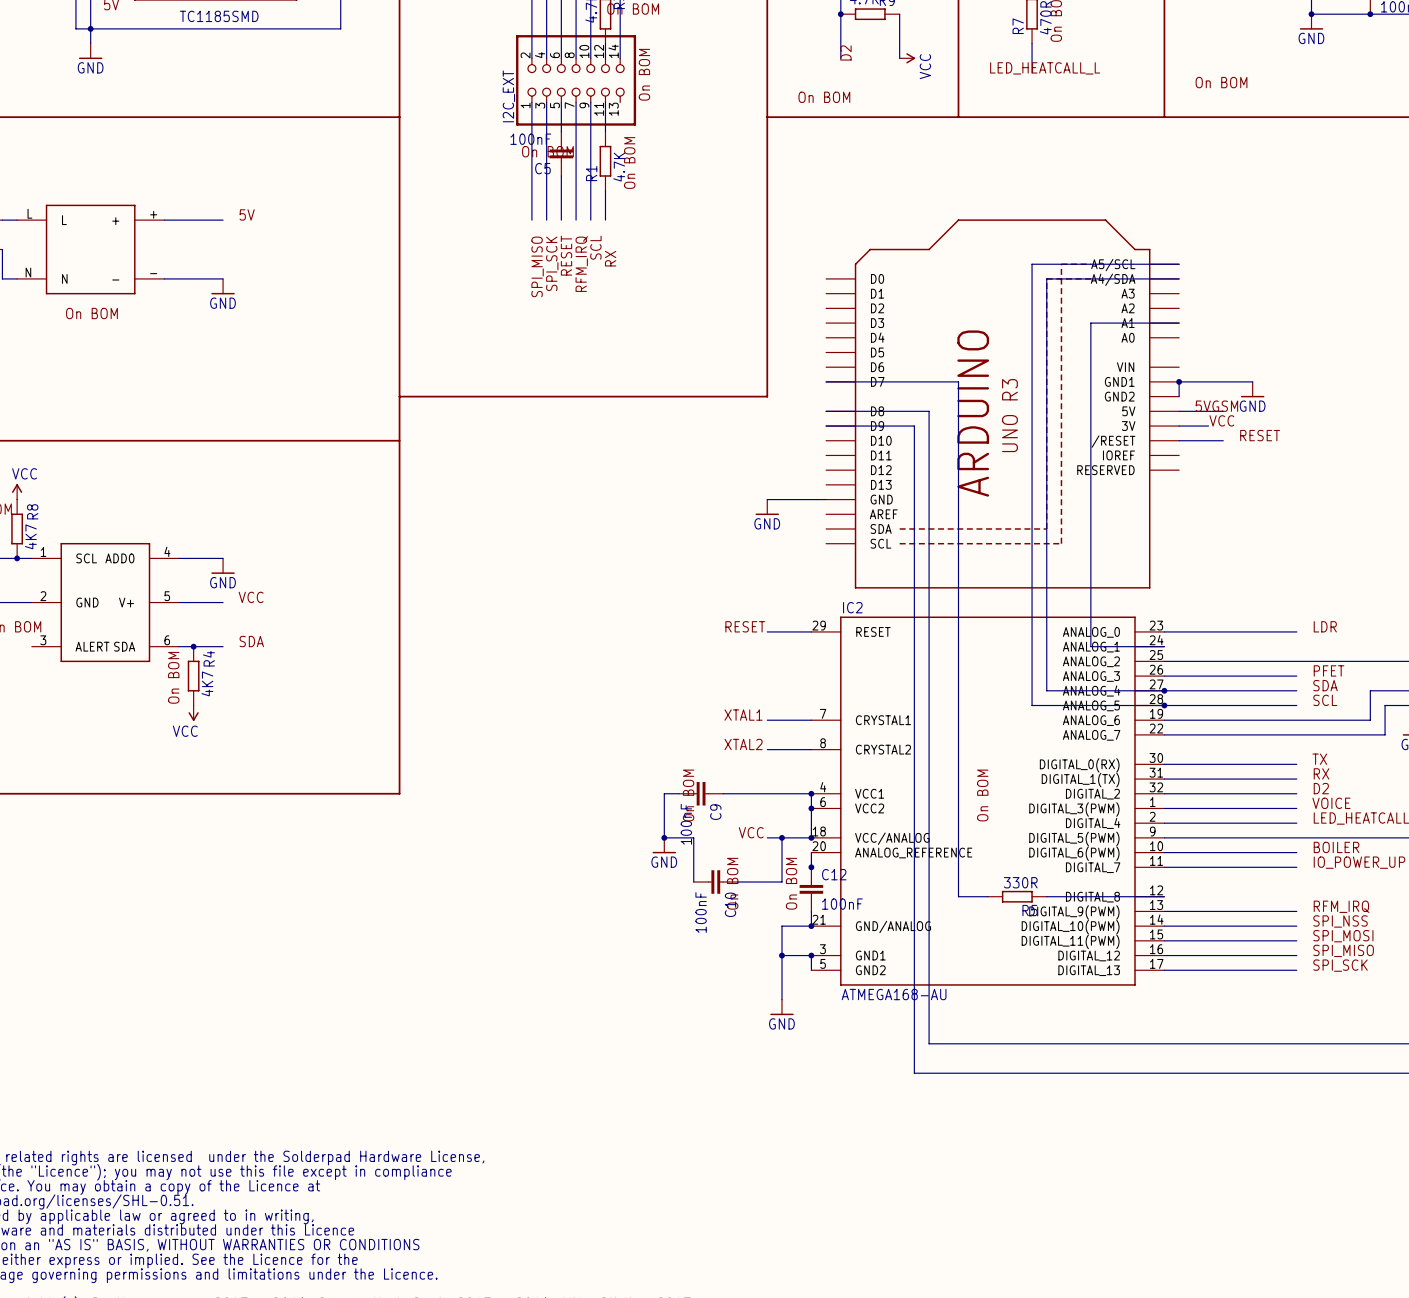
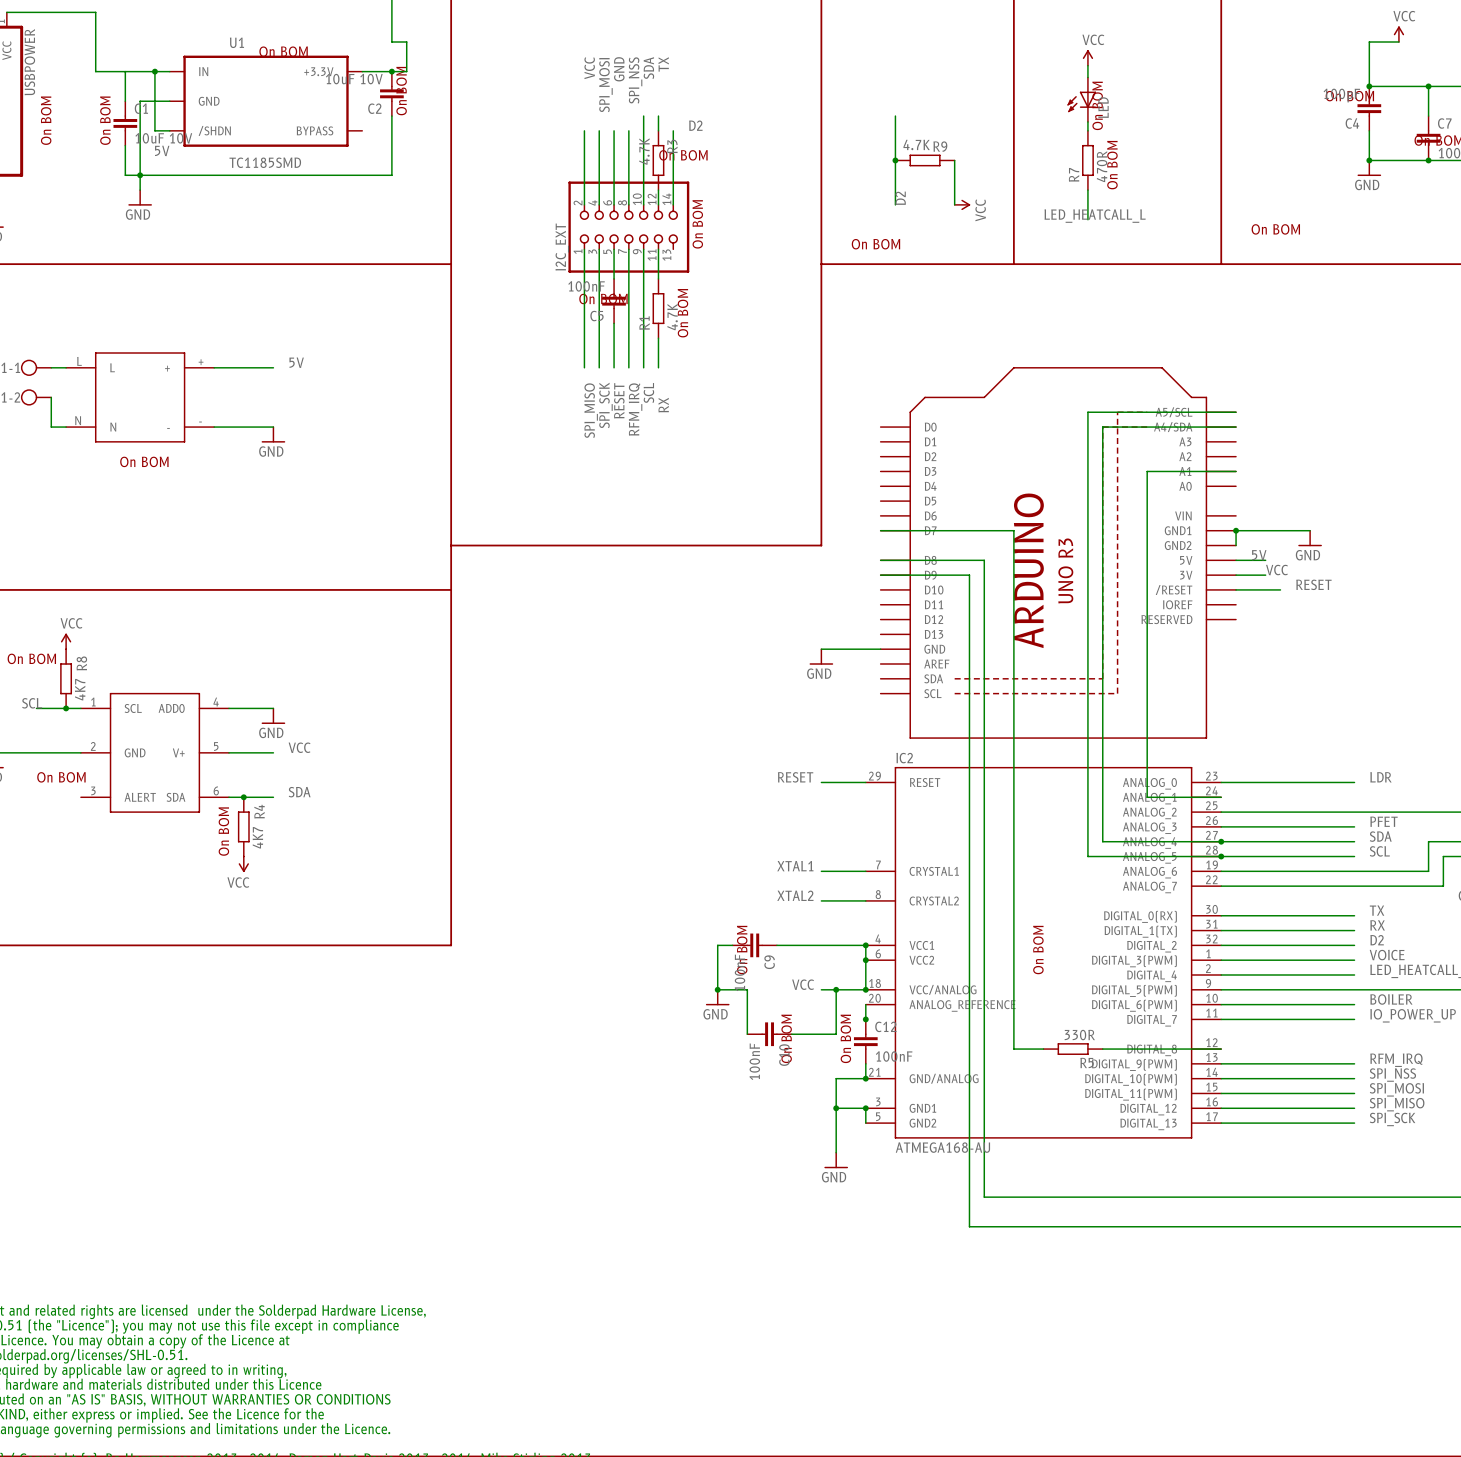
label: 5VGSM (1216, 406) -> 5V (1259, 555)
wire: (1208, 411) (1223, 411) -> none

